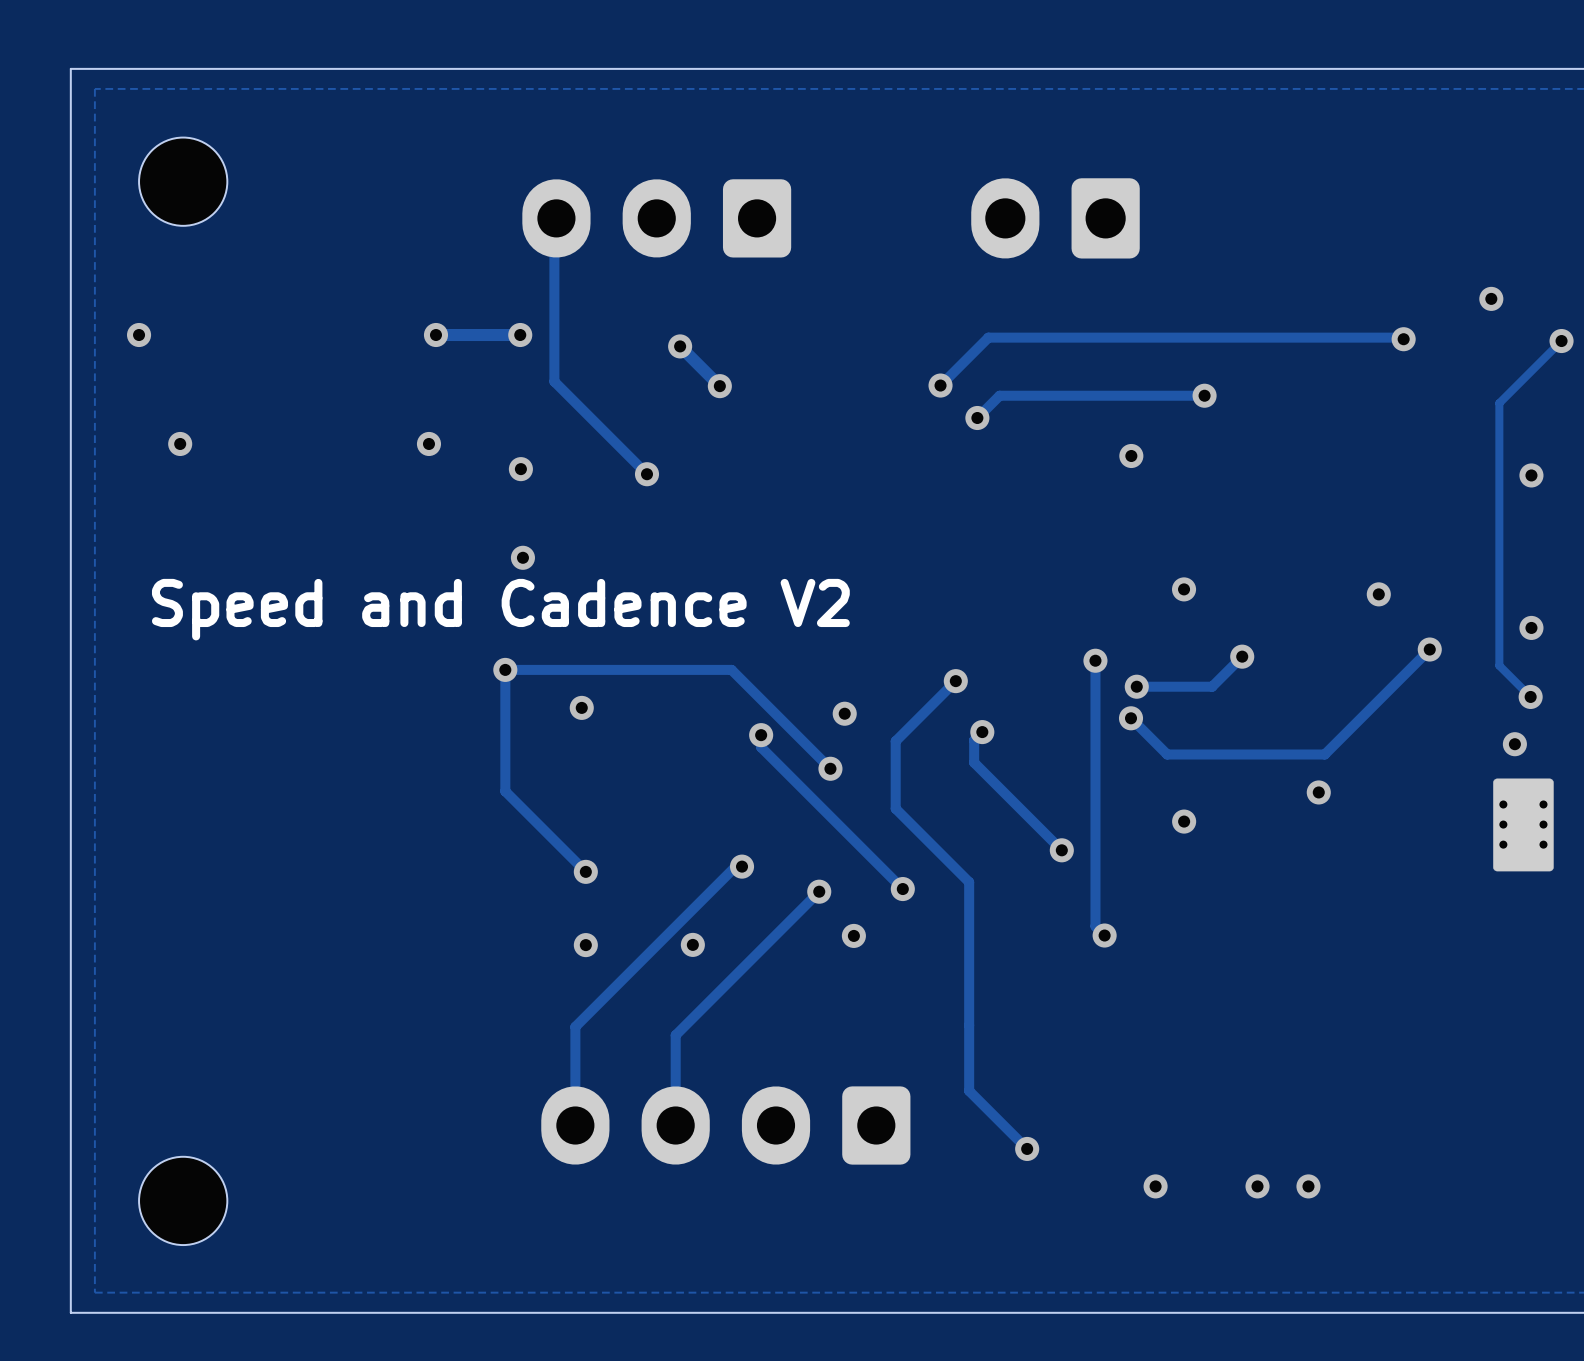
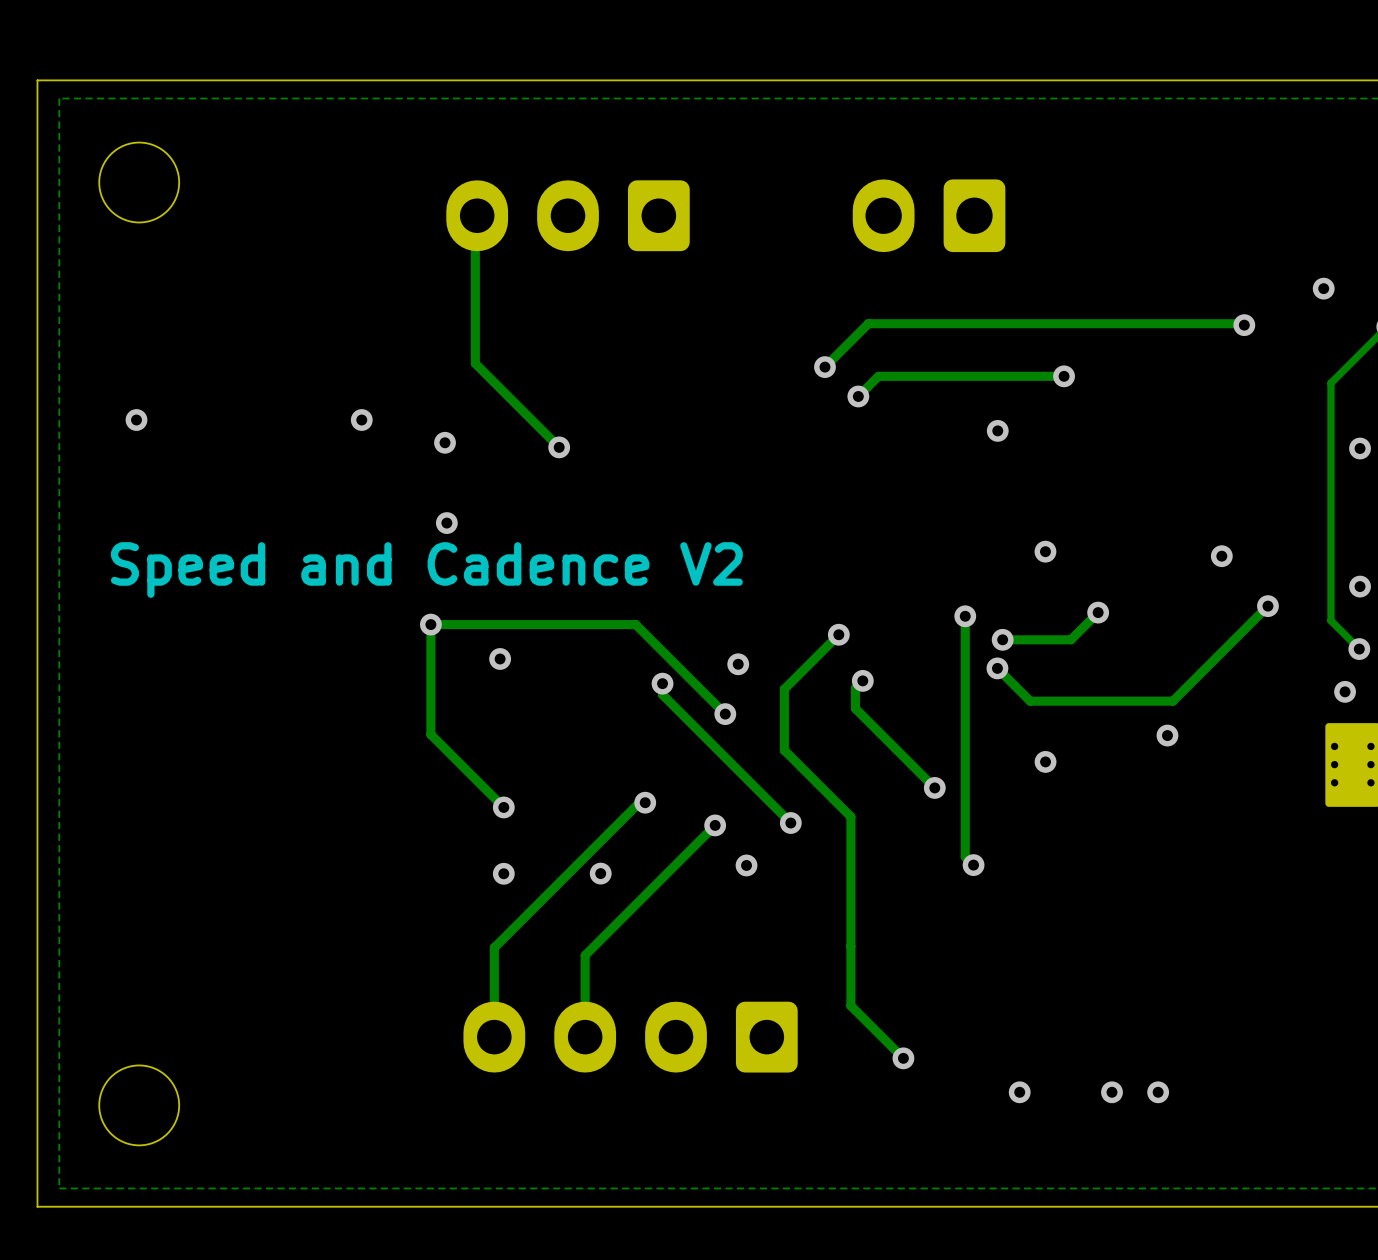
via: (139, 335) -> none
via: (435, 335) -> none
track: (520, 335) (435, 335) -> none
via: (520, 335) -> none
track: (680, 346) (719, 386) -> none
via: (680, 346) -> none
via: (719, 386) -> none

